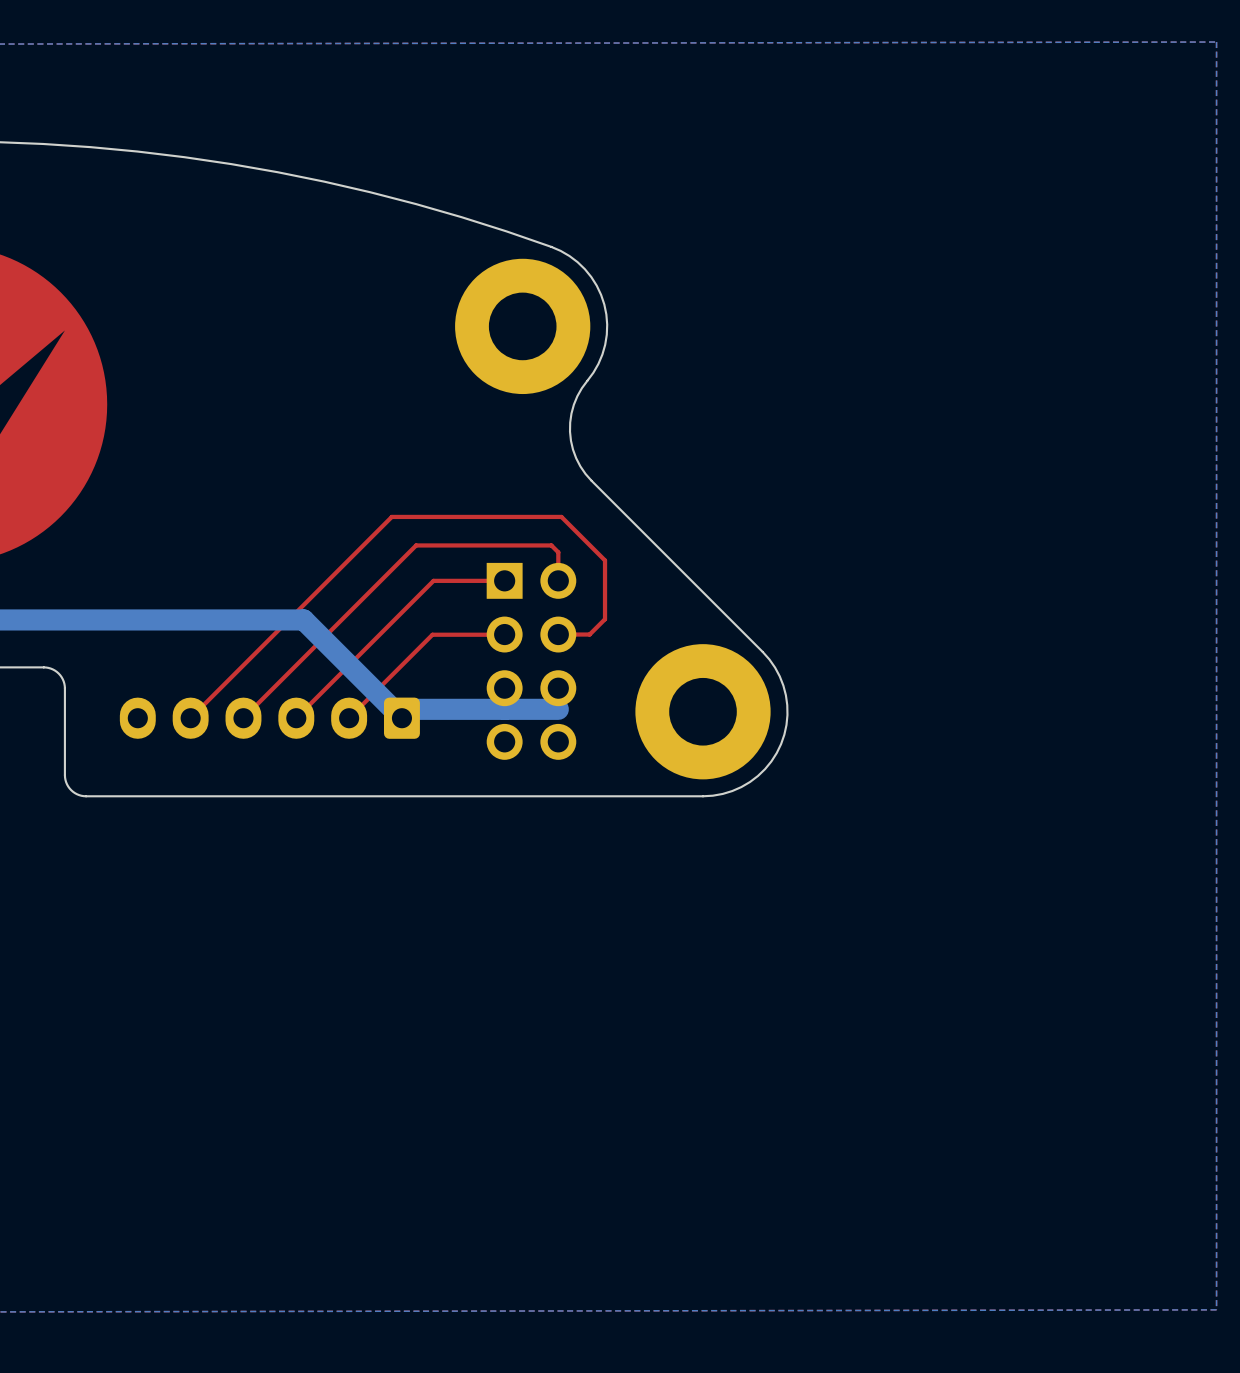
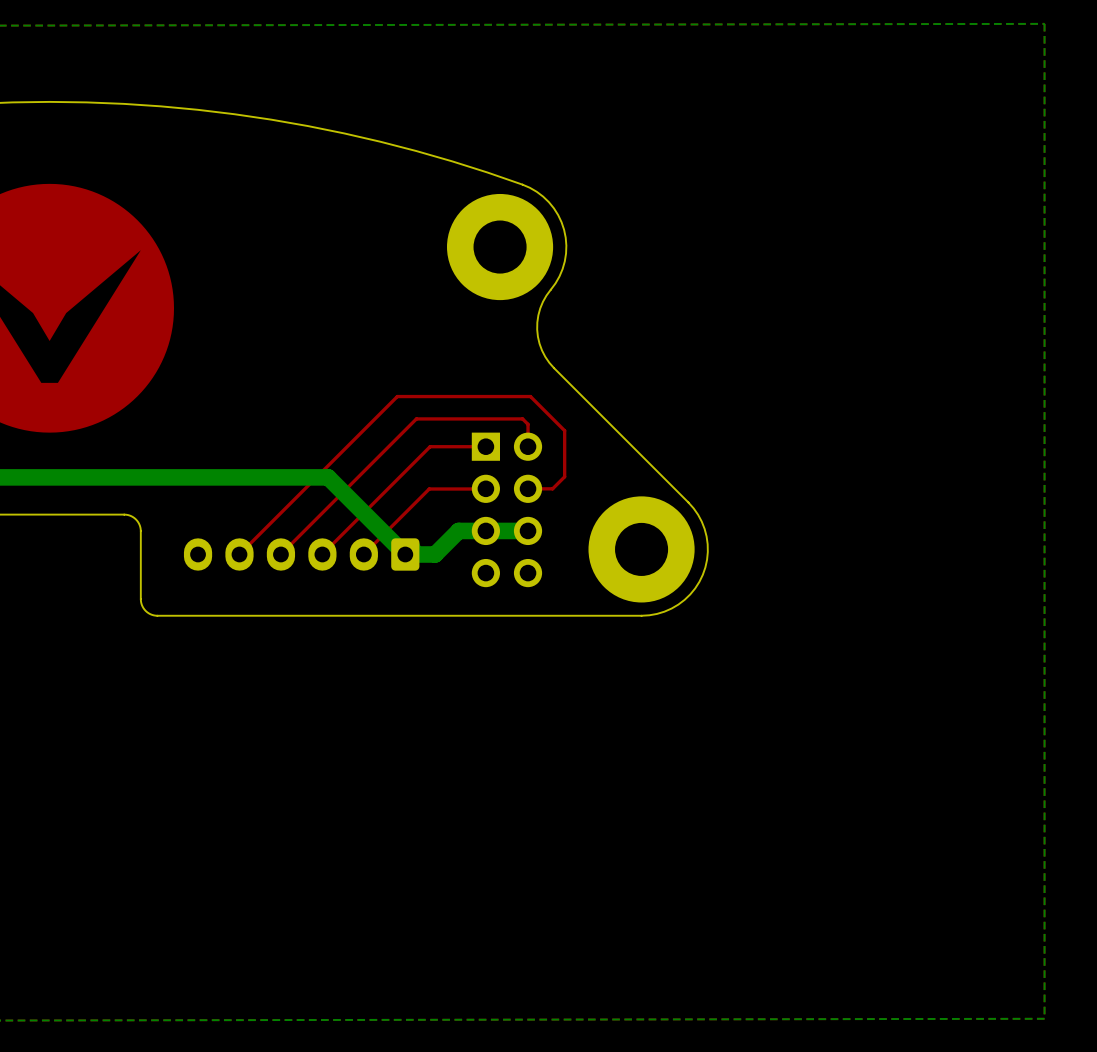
bottom track: none -> (528, 530) (458, 530) (435, 554) (405, 554)
bottom track: (558, 709) (410, 709) -> none

